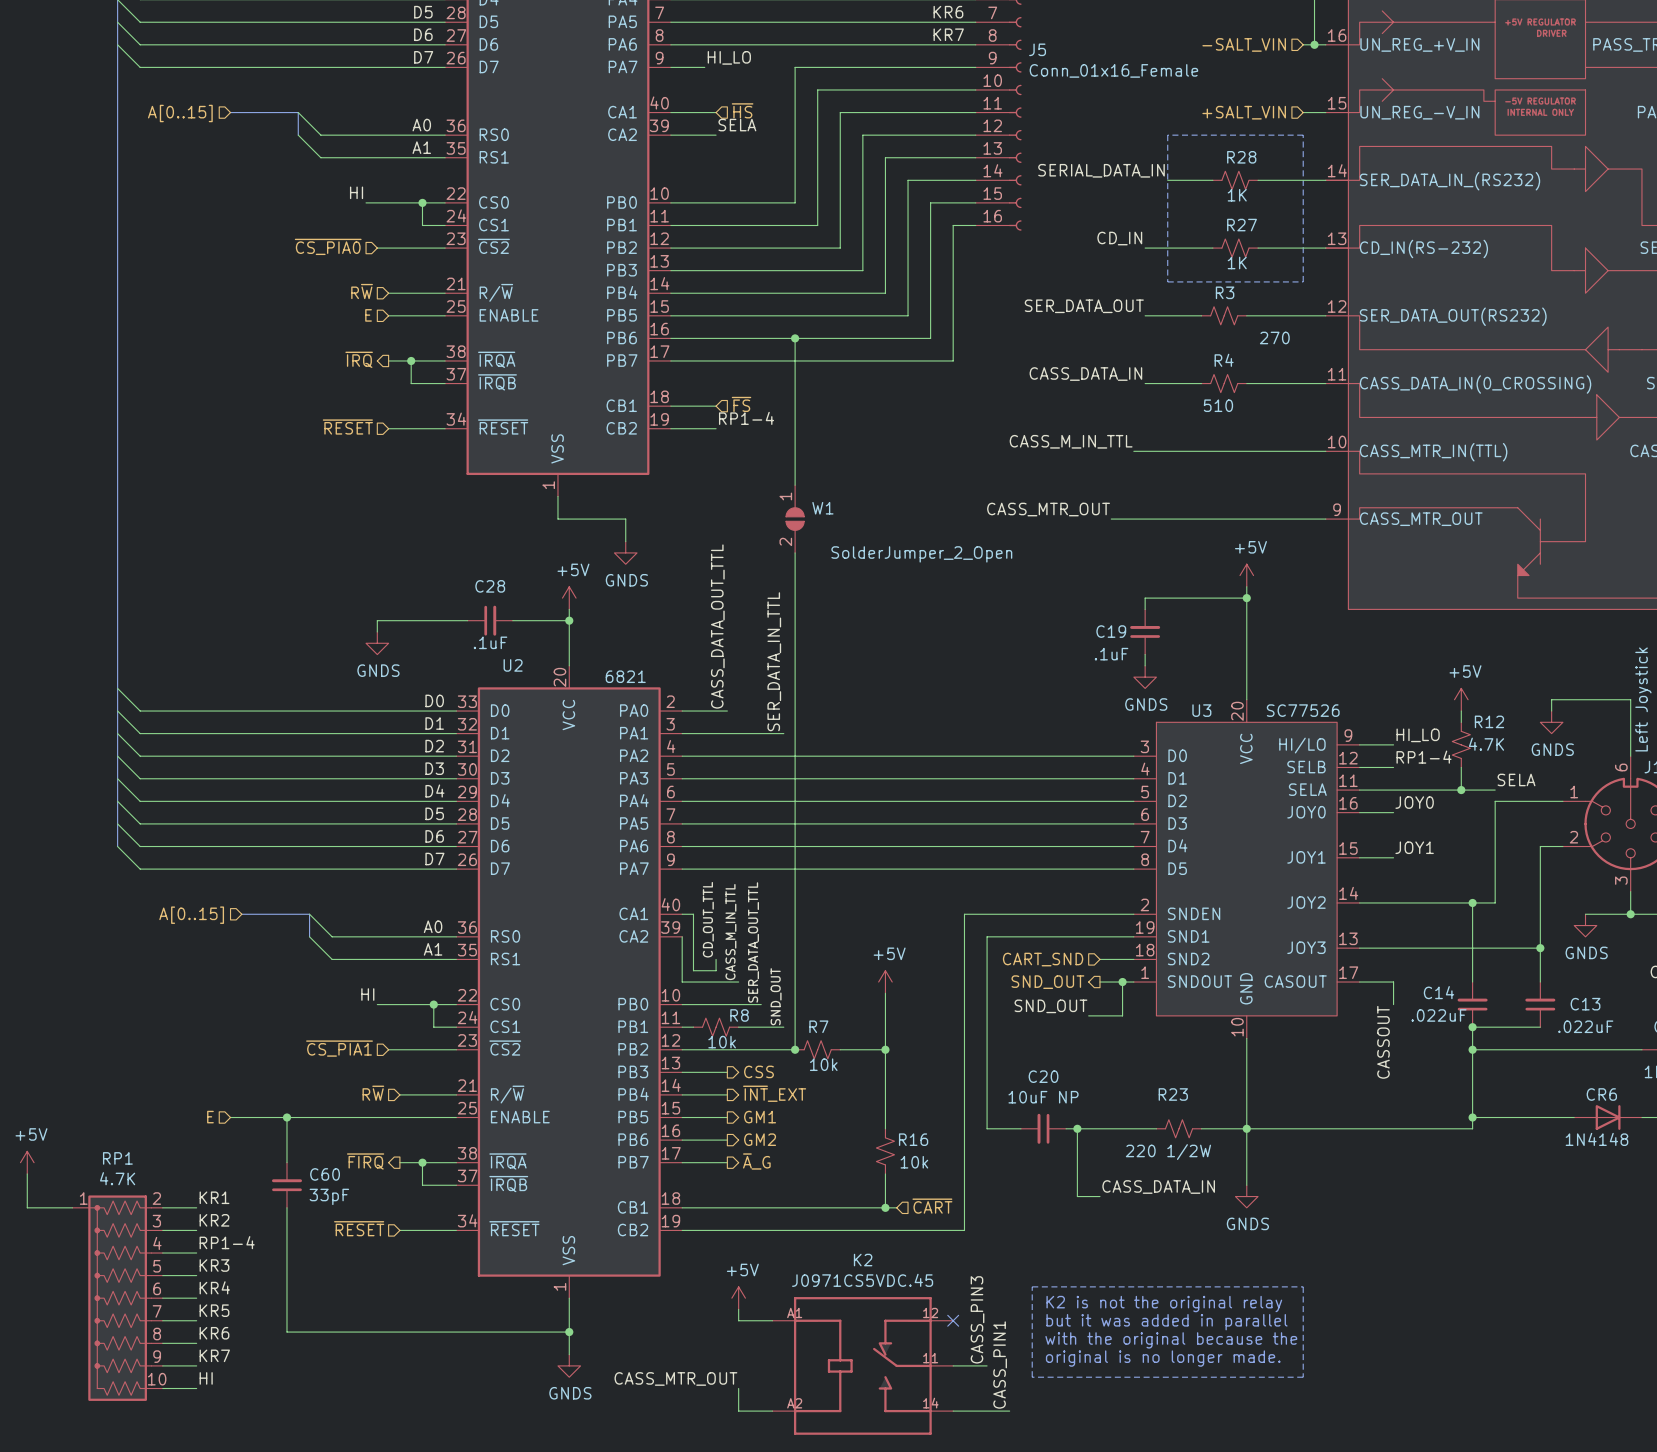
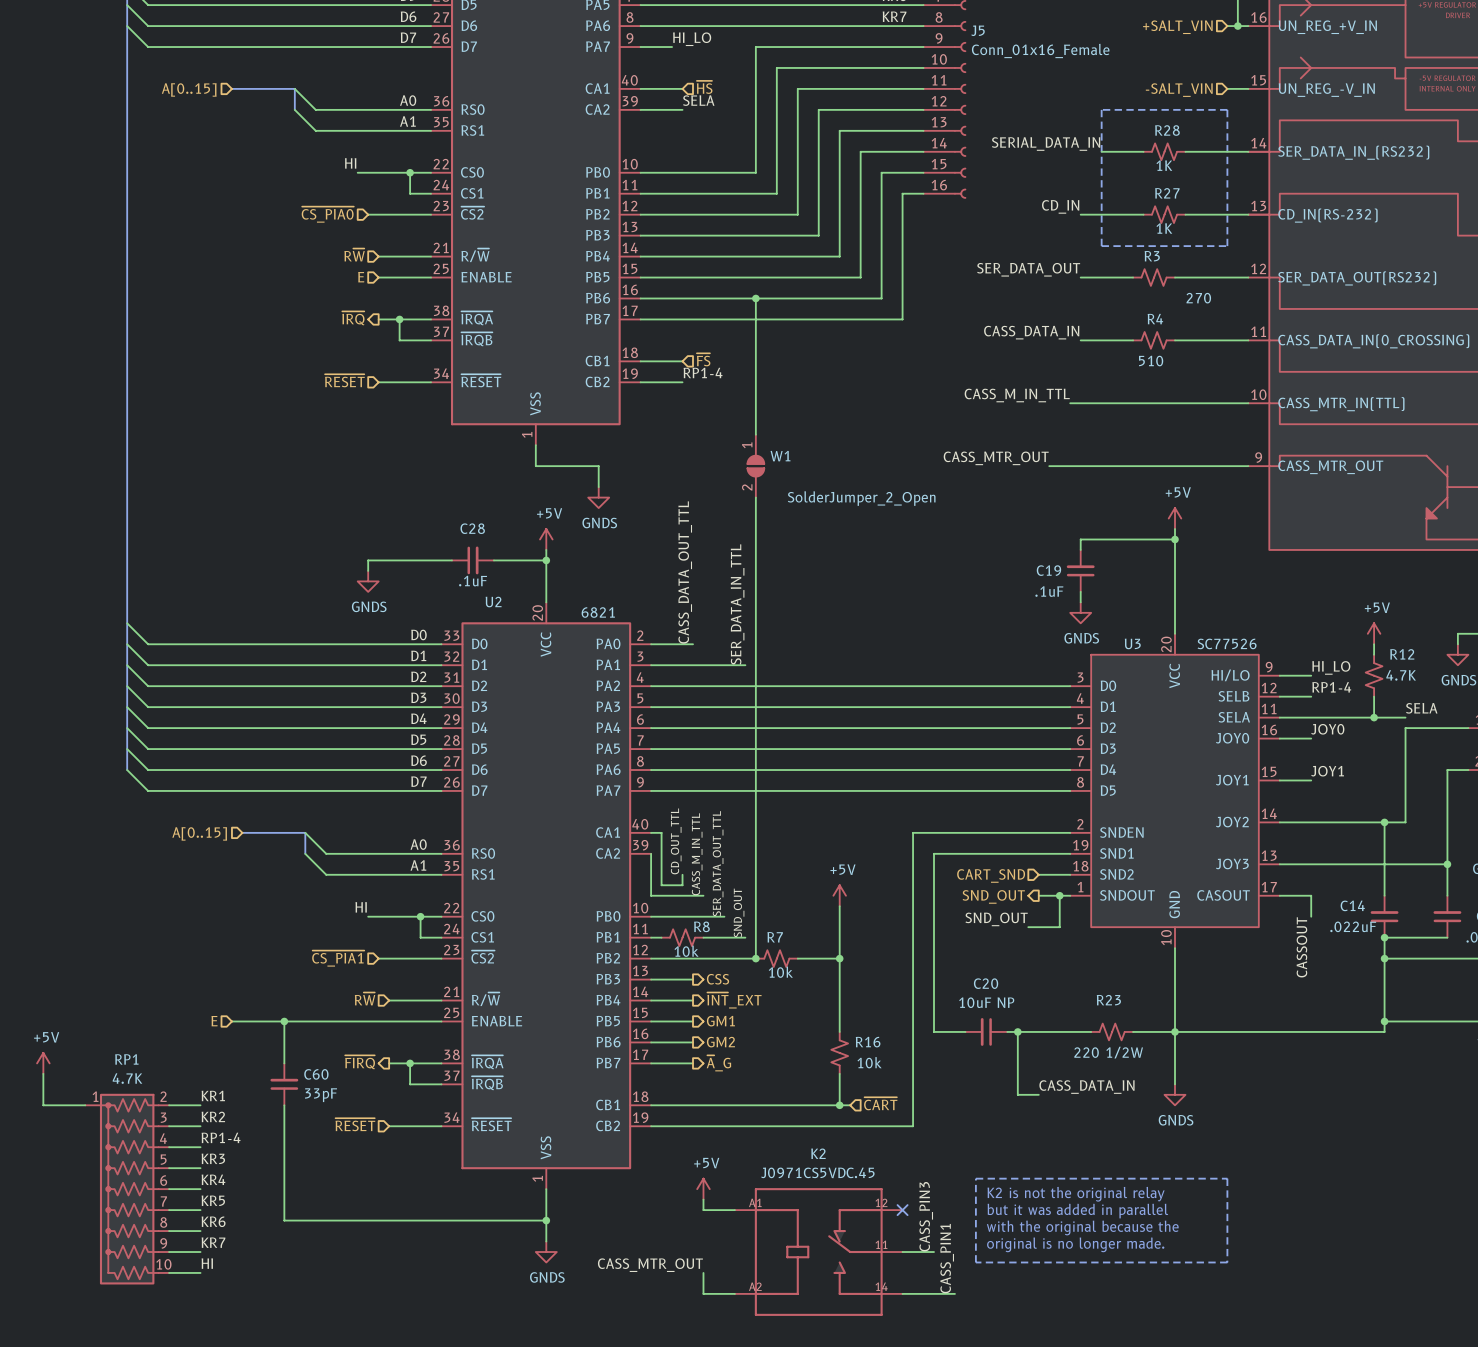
hierarchical label: -SALT_VIN (1244, 44) -> +SALT_VIN (1177, 27)
hierarchical label: +SALT_VIN (1244, 112) -> -SALT_VIN (1179, 90)

